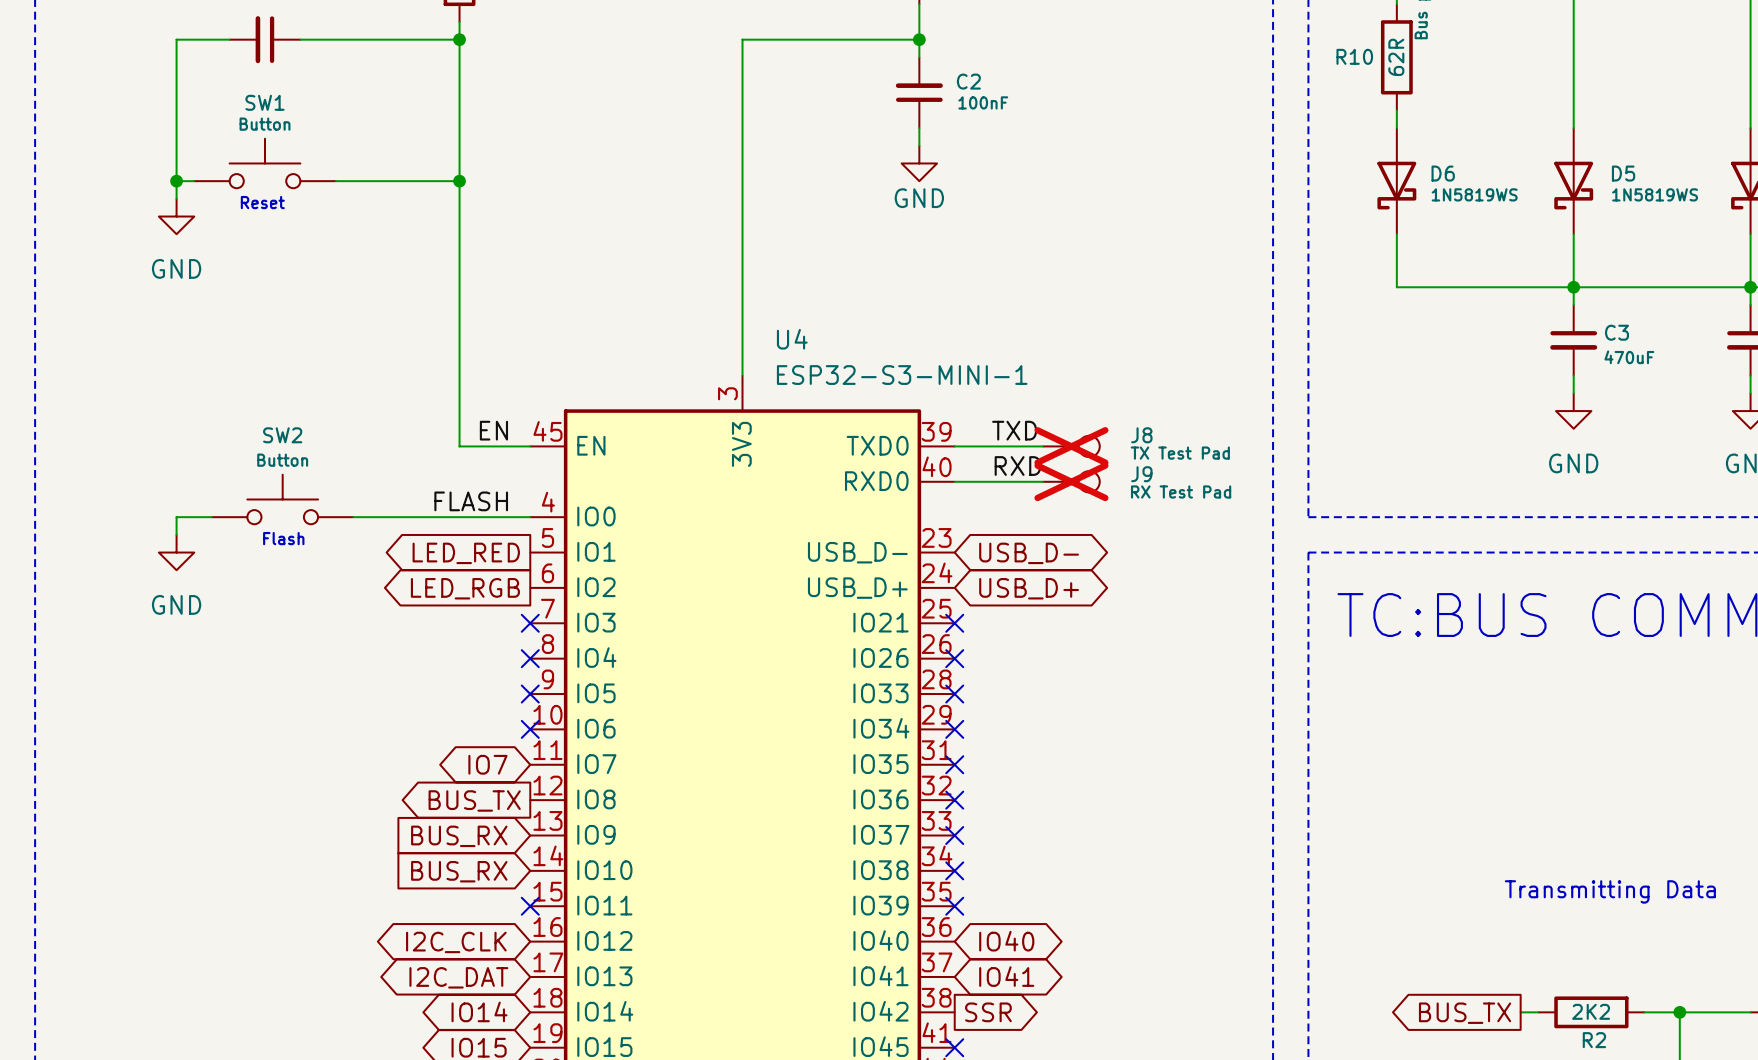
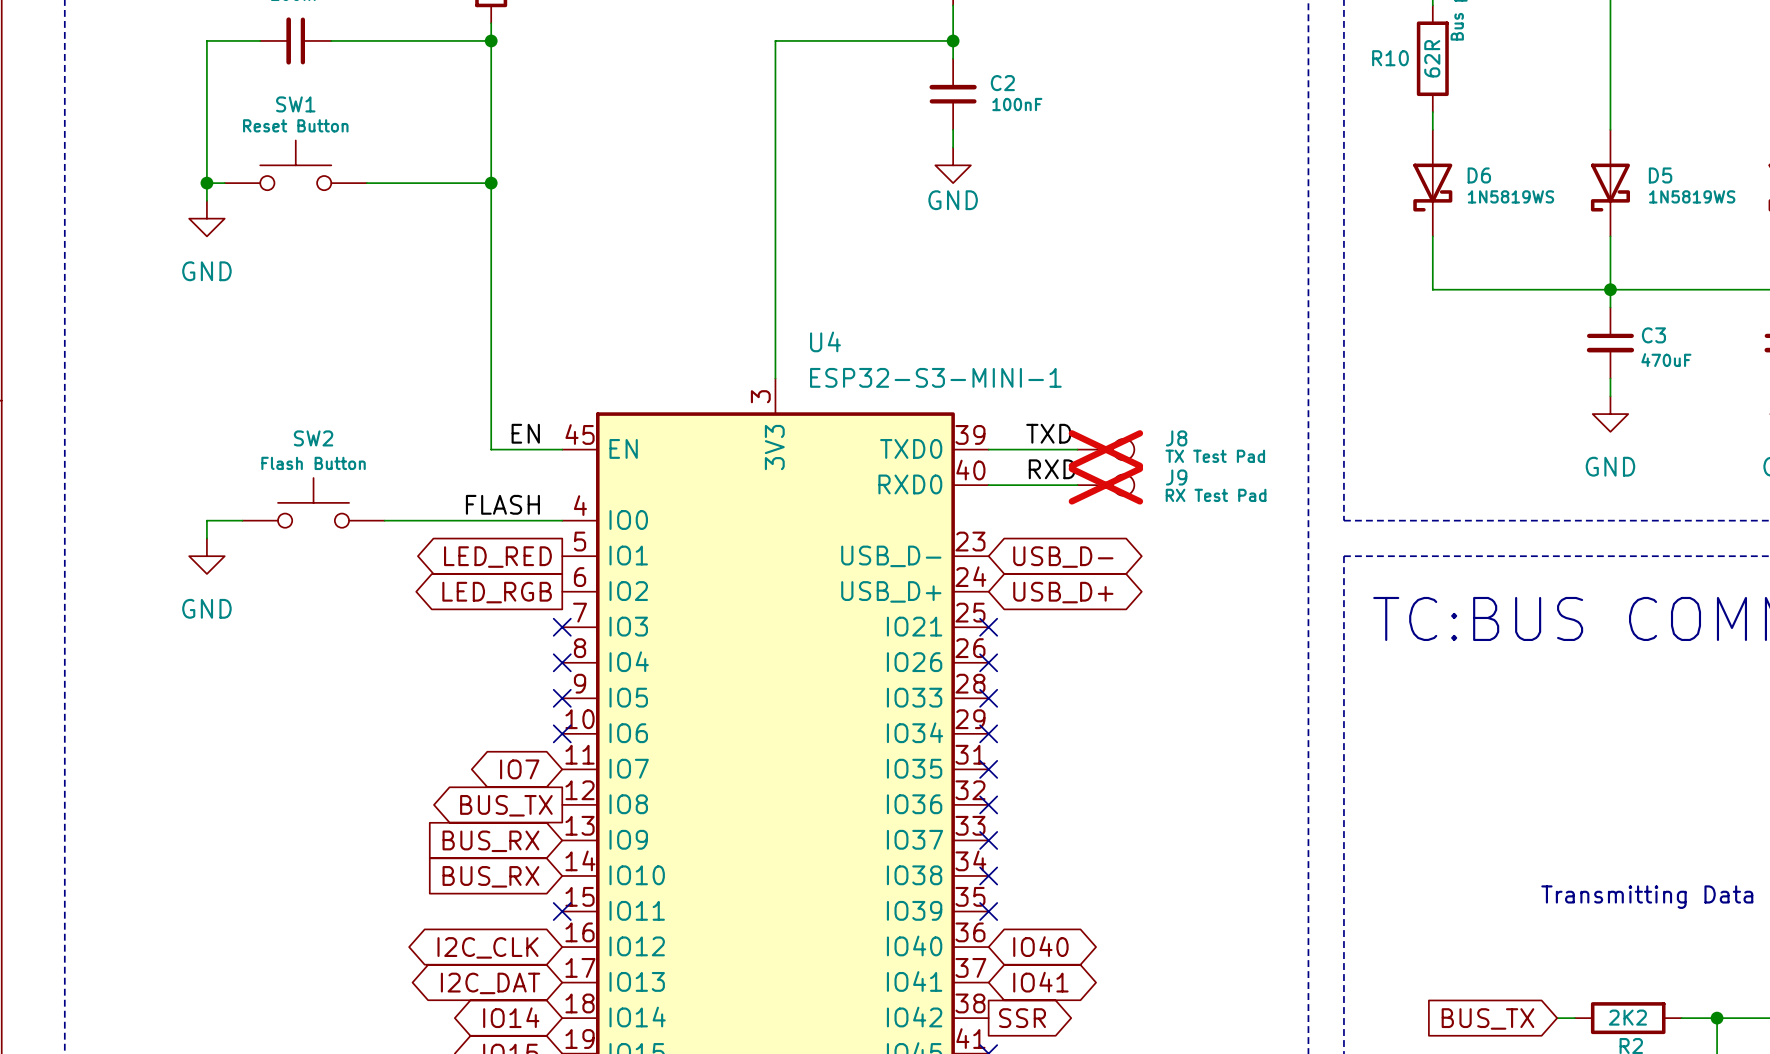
SW1 value: Button (265, 124) -> Reset Button (295, 125)
text: Reset (262, 202) -> none
SW2 value: Button (282, 460) -> Flash Button (313, 463)
text: Flash (283, 538) -> none
global label shape: output (1465, 1013) -> input (1487, 1018)

